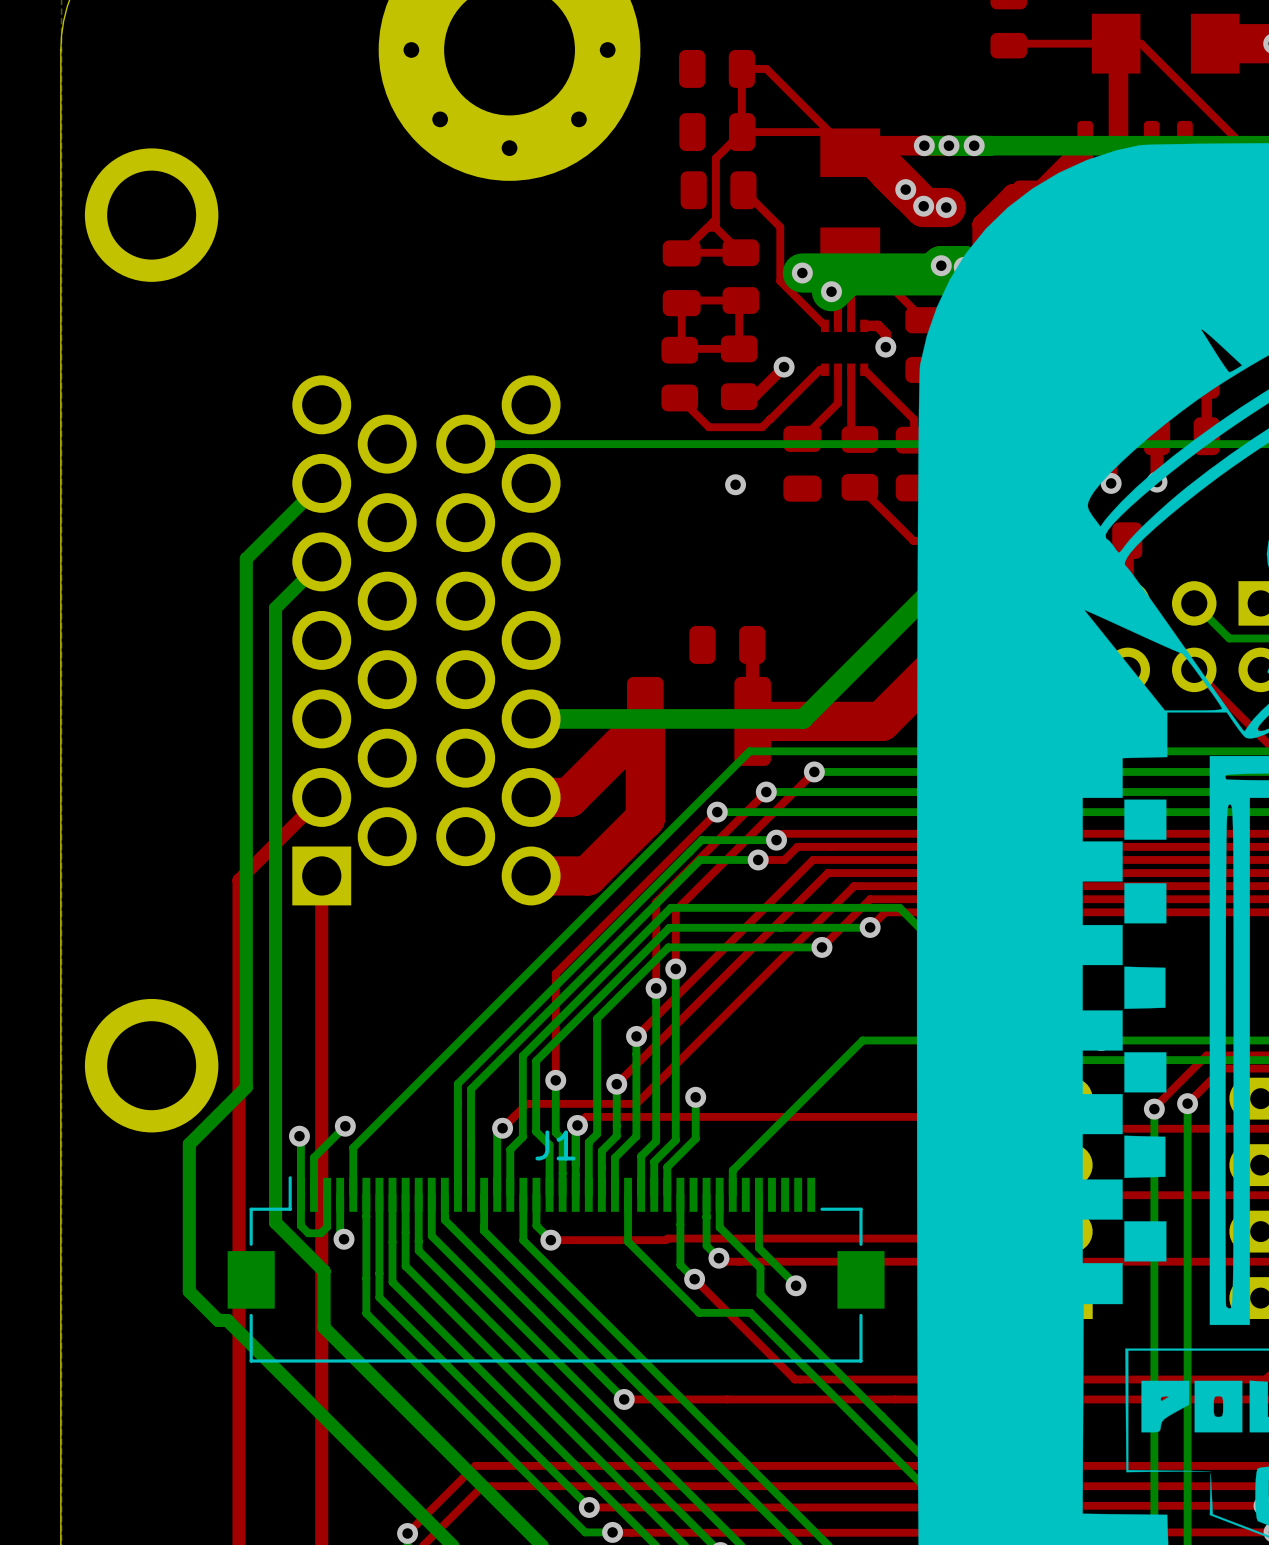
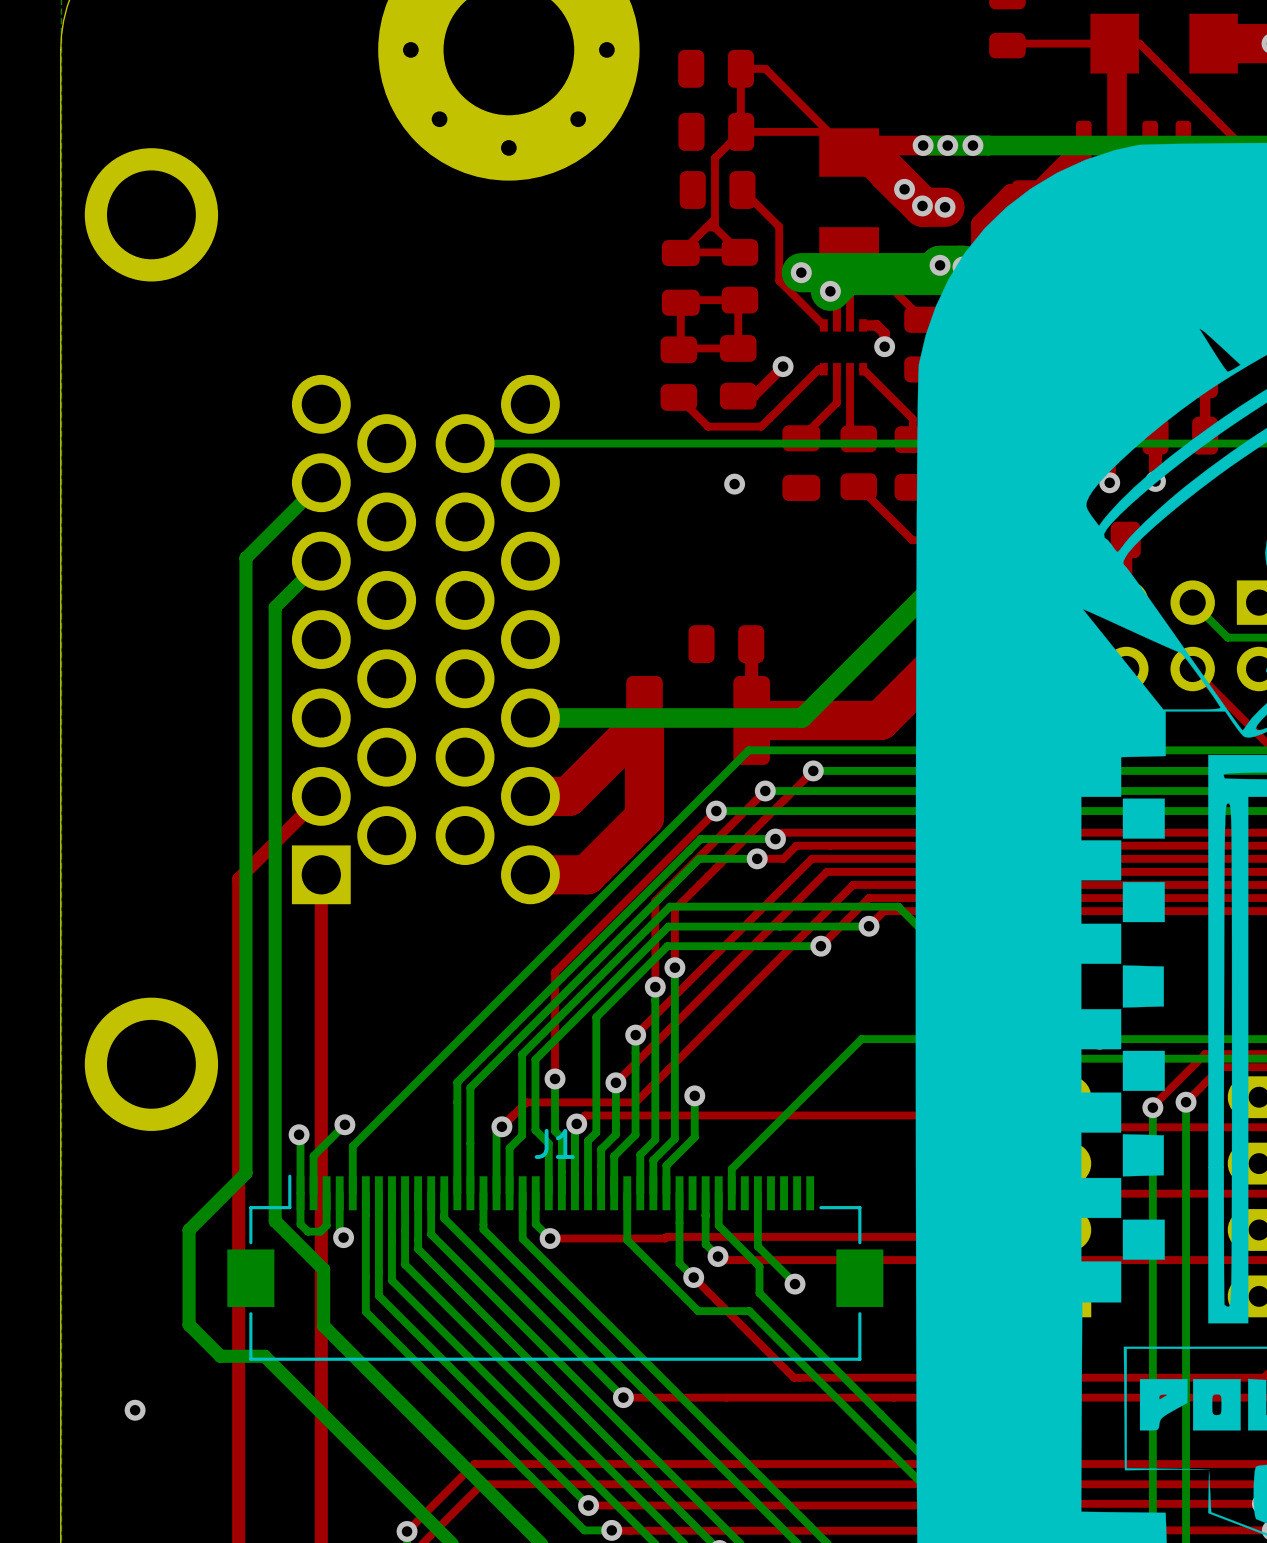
bottom track: (246, 1087) (189, 1144) (189, 1231) -> (245, 1085) (245, 1173) (189, 1230)
bottom track: (189, 1291) (218, 1320) (227, 1320) (265, 1358) -> (189, 1289) (189, 1324) (220, 1356) (264, 1356)
via: none -> (135, 1410)

